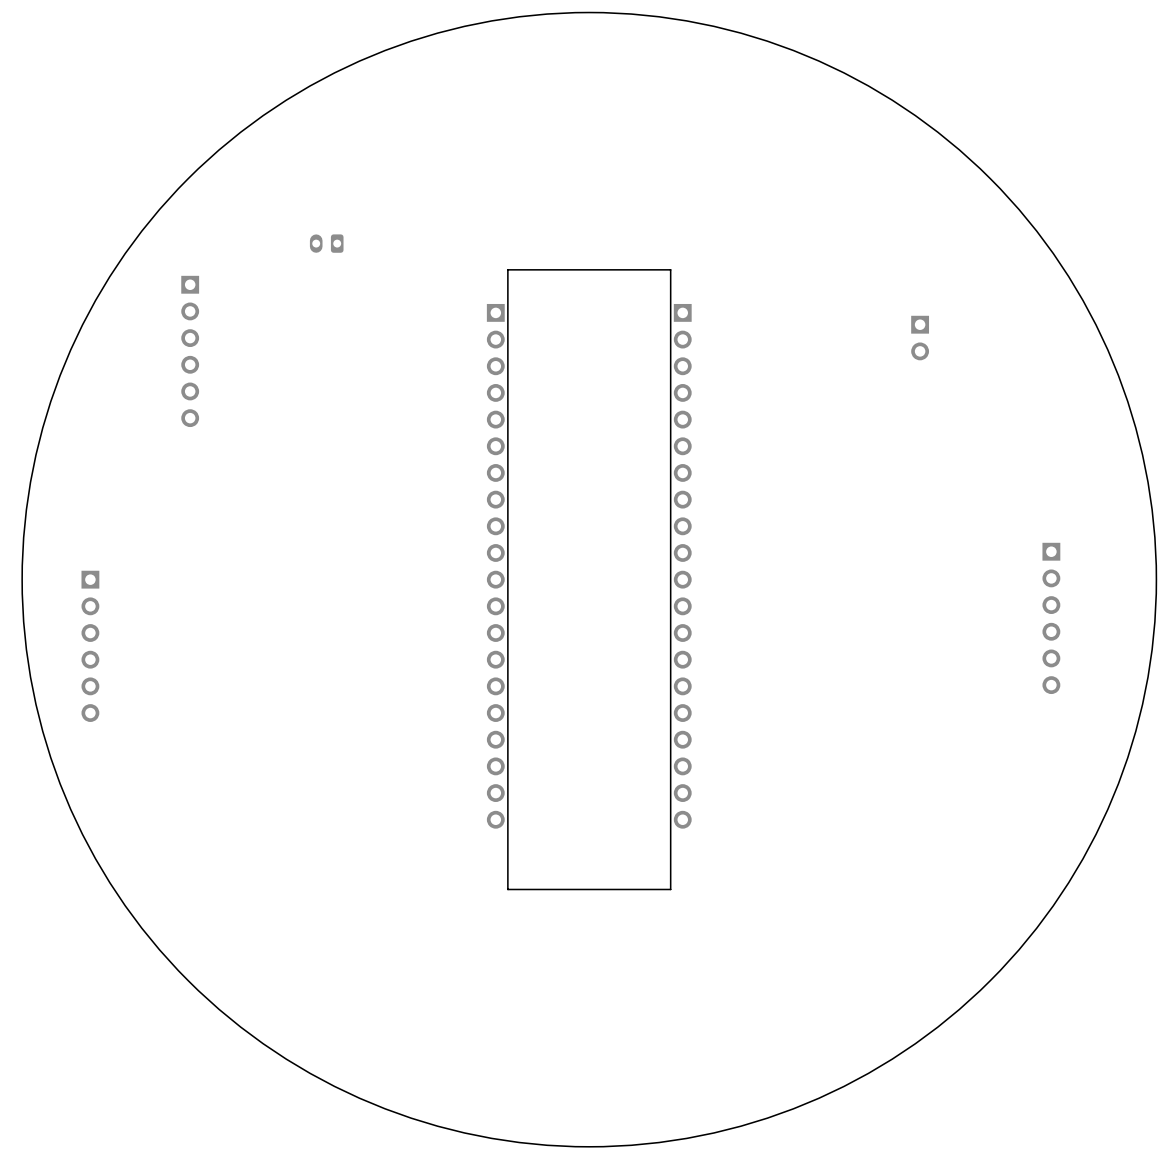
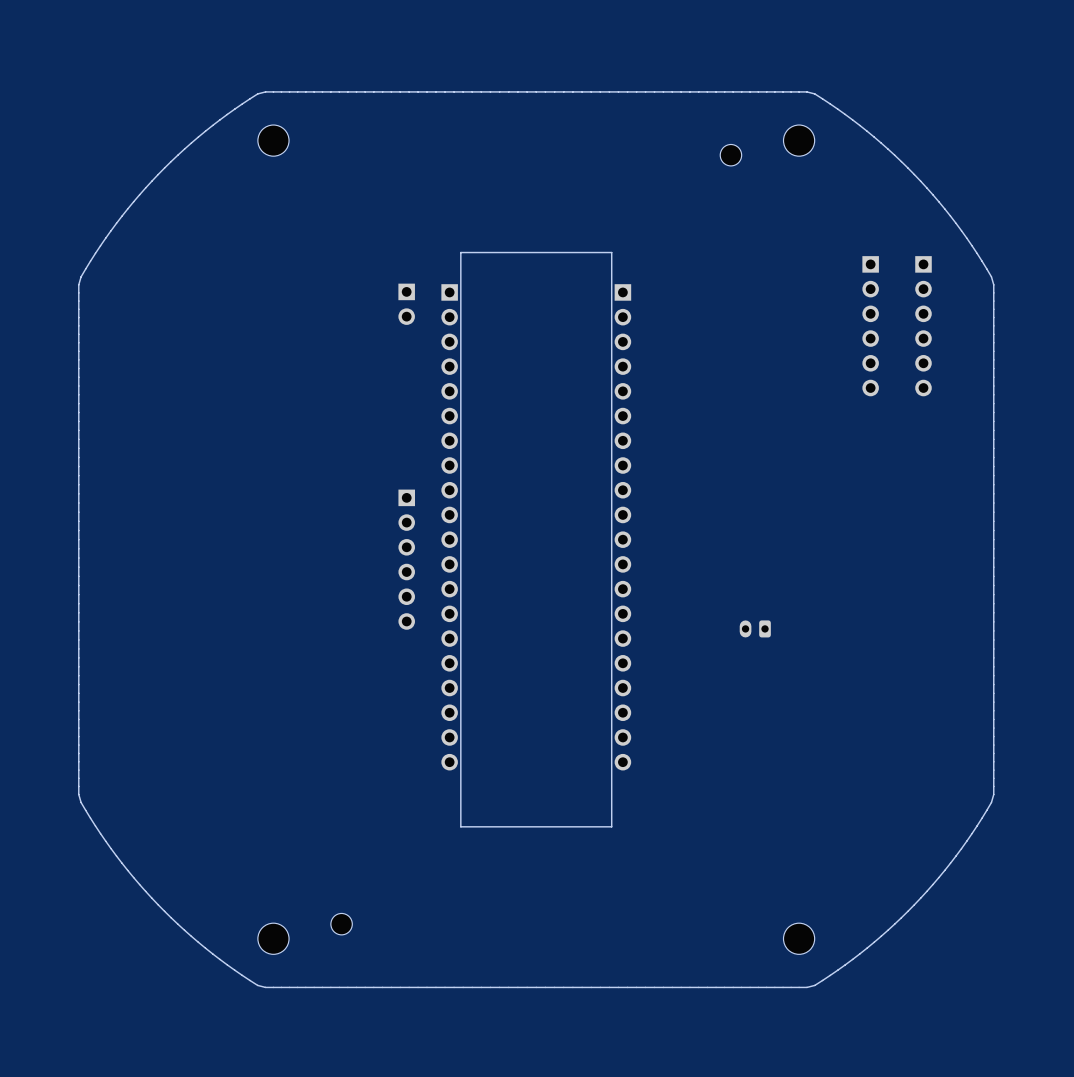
round board edge: [21, 11, 1158, 1148] -> none
board edge: none -> (806, 91) (814, 93) (859, 125) (914, 174) (961, 230) (986, 268) (993, 284) (993, 794) (982, 818) (944, 870) (901, 917) (845, 964) (814, 985) (806, 987) (265, 987) (257, 985) (198, 942) (151, 898) (105, 841) (81, 802) (78, 794) (78, 284) (90, 261) (127, 208) (171, 161) (227, 114) (257, 93) (265, 91) (806, 91)
part: none -> (273, 140)
part: none -> (799, 140)
part: none -> (730, 155)
part: (326, 243) -> none
part: none -> (406, 304)
part: (920, 338) -> none
part: none -> (870, 326)
part: none -> (923, 326)
part: (190, 351) -> none
part: none -> (406, 559)
part: (1051, 618) -> none
part: (90, 646) -> none
part: none -> (755, 628)
part: none -> (341, 924)
part: none -> (273, 938)
part: none -> (799, 938)

